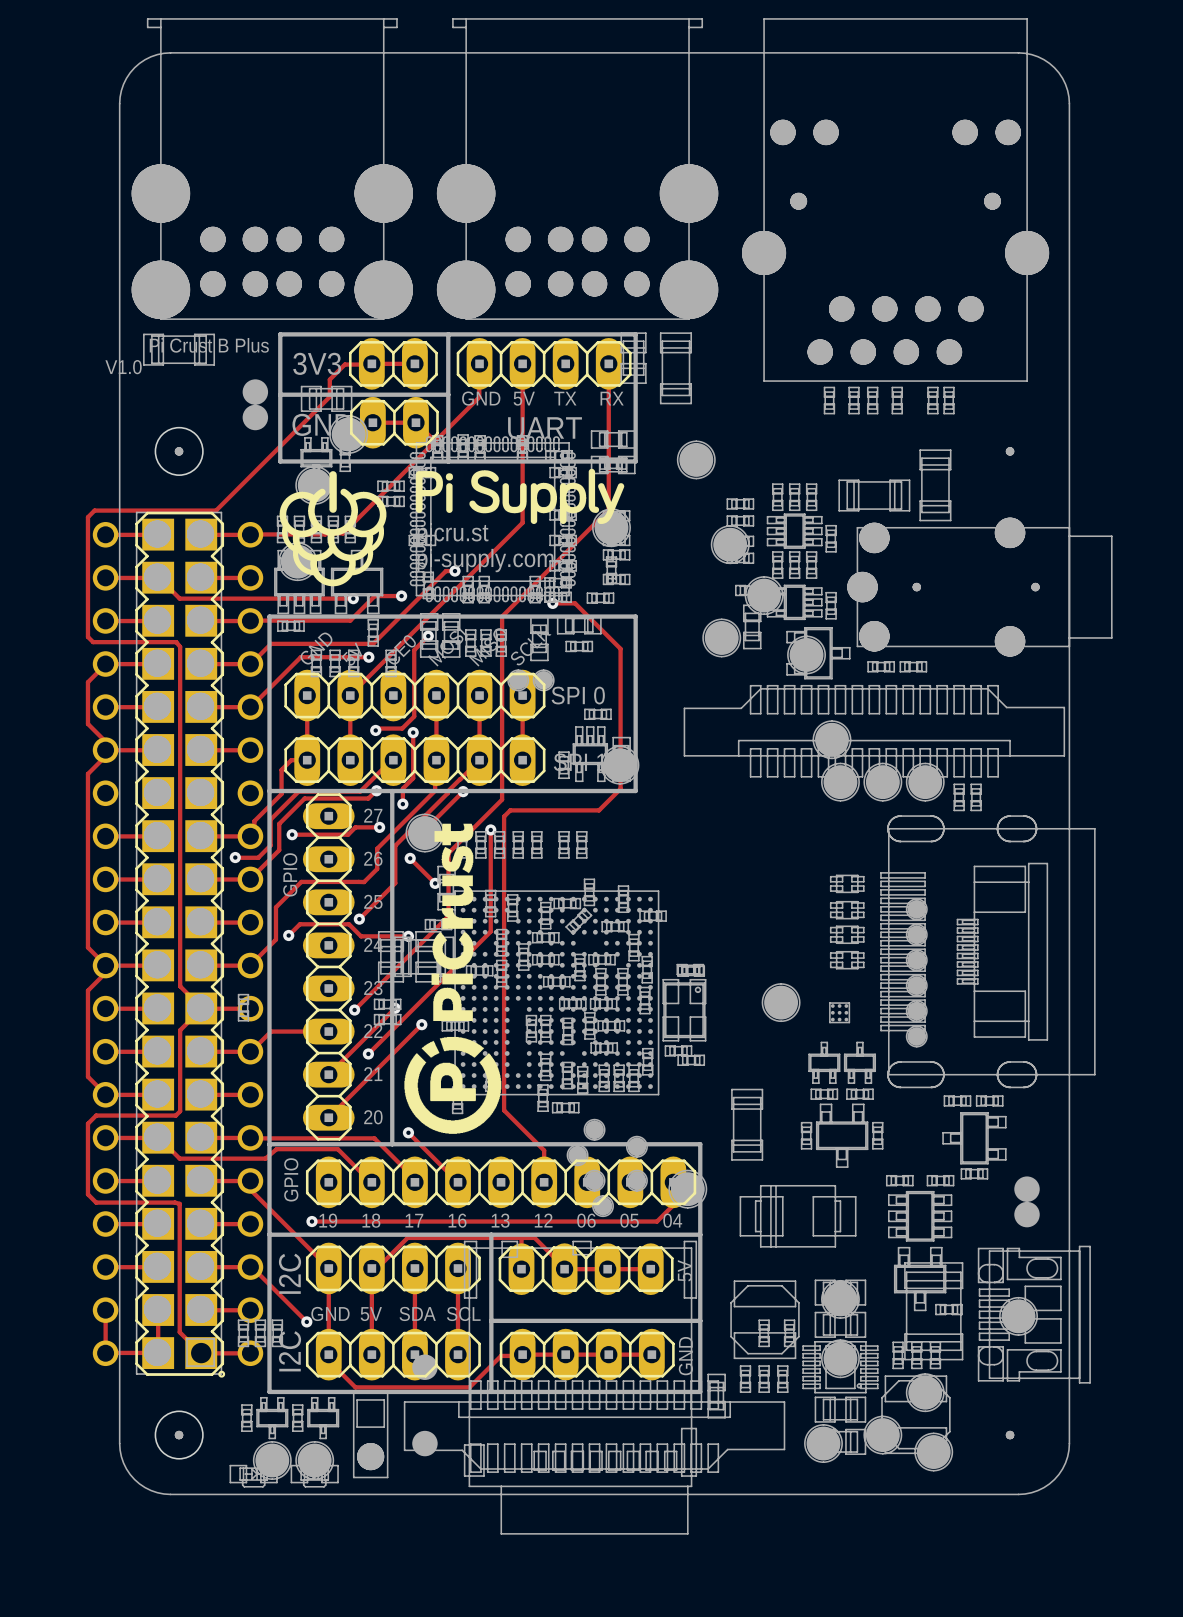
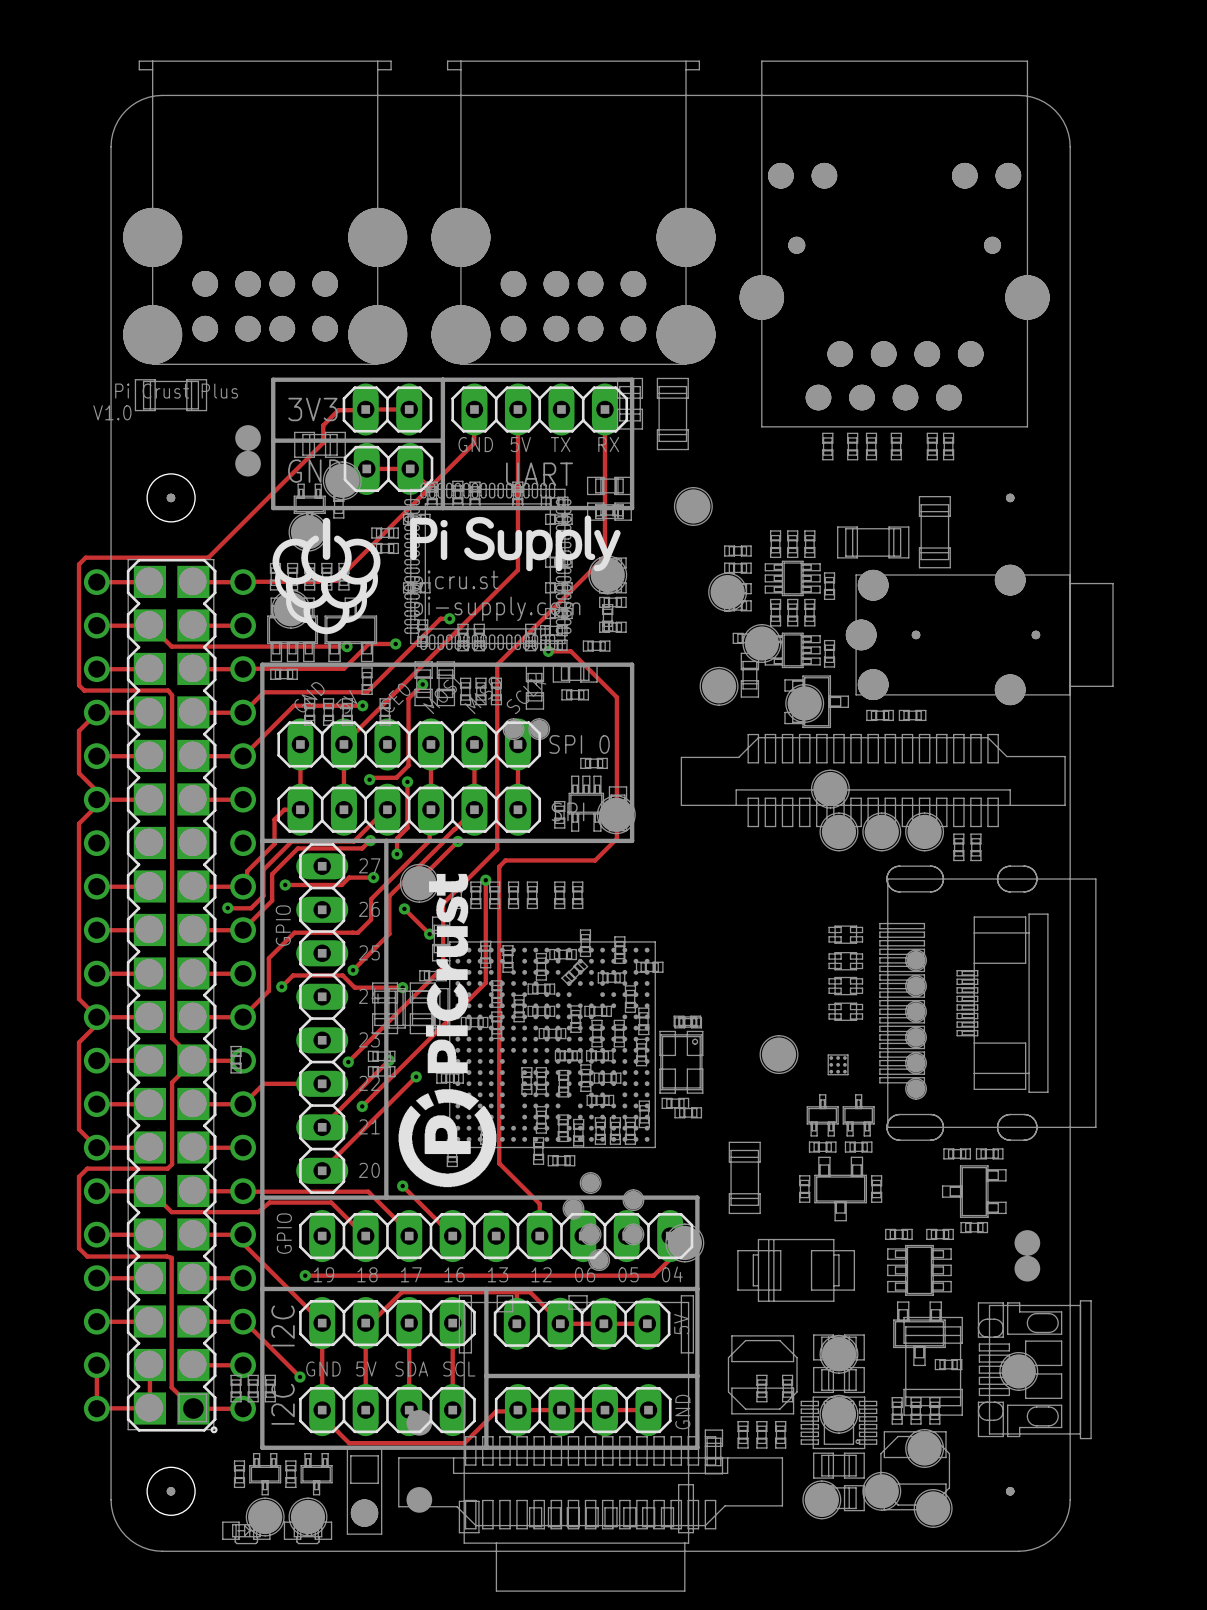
text: Pi Crust B Plus (209, 345) -> Pi Crust Plus (176, 391)

